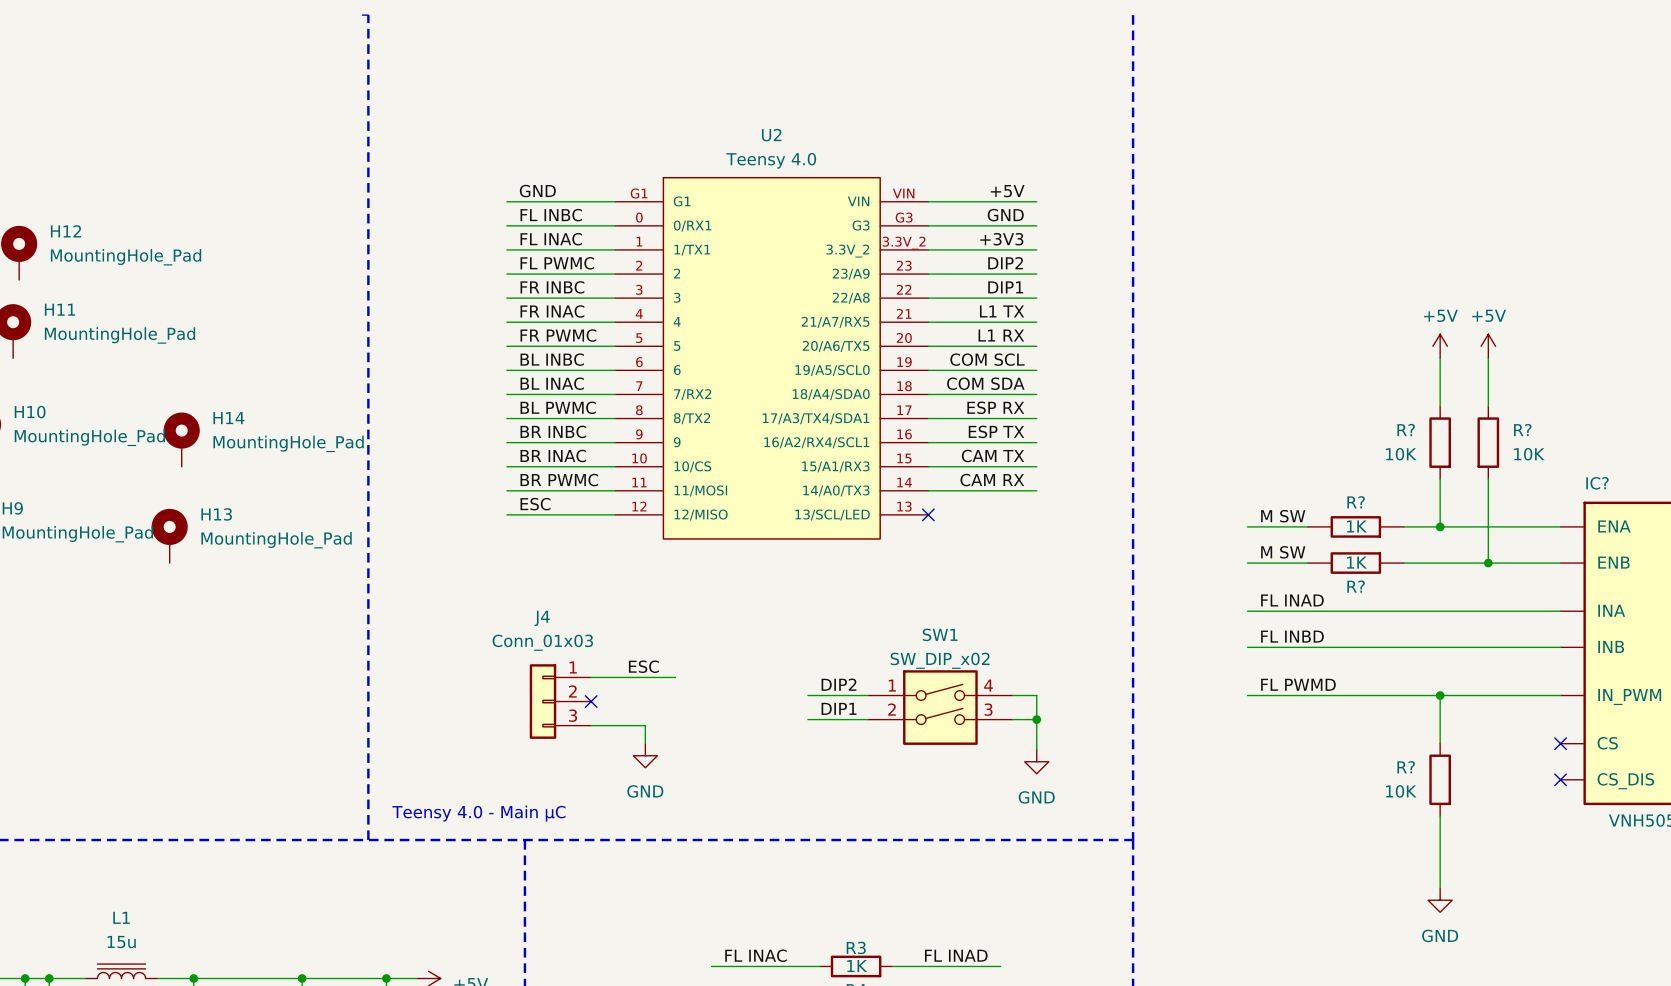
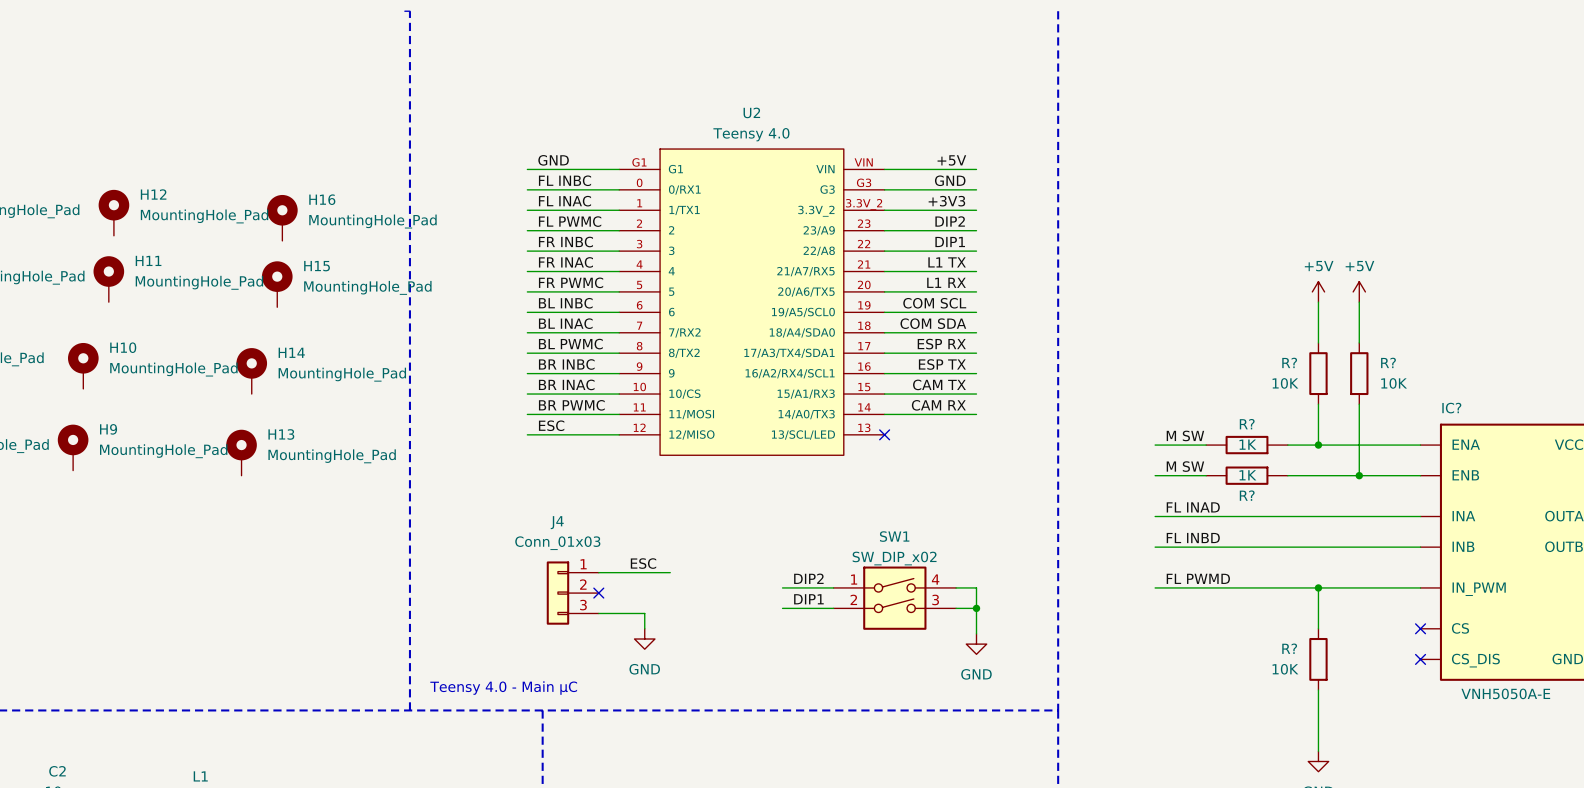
H16: none -> MountingHole_Pad (282, 217)
H15: none -> MountingHole_Pad (277, 284)

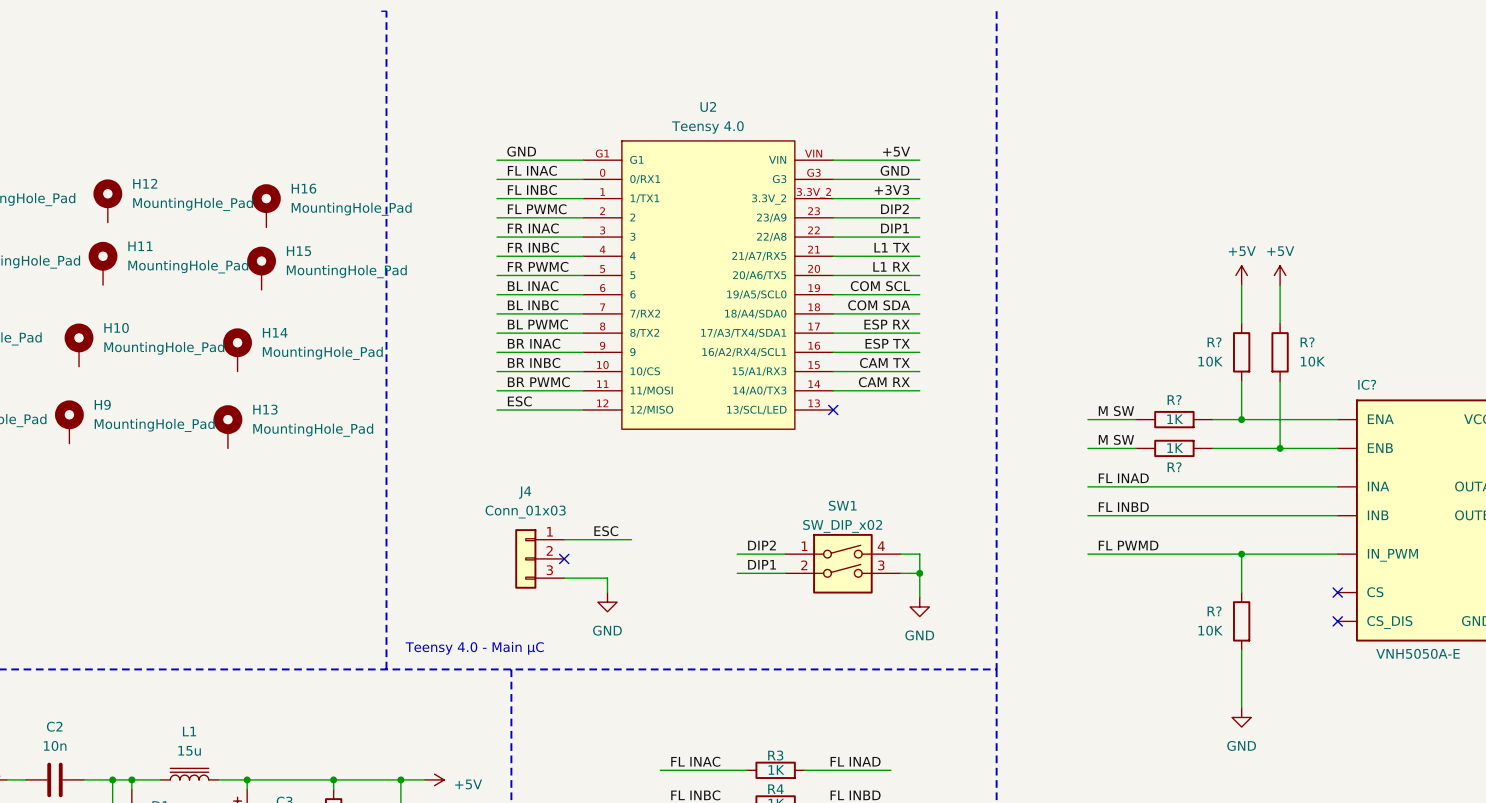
label: FL INBC (565, 180) -> FL INAC (532, 170)
label: FL INAC (565, 201) -> FL INBC (532, 190)
label: FR INBC (565, 242) -> FR INAC (533, 228)
label: FR INAC (565, 262) -> FR INBC (533, 247)
label: BL INBC (565, 303) -> BL INAC (533, 286)
label: BL INAC (565, 323) -> BL INBC (533, 305)
label: BR INBC (566, 364) -> BR INAC (534, 343)
label: BR INAC (566, 384) -> BR INBC (534, 362)

